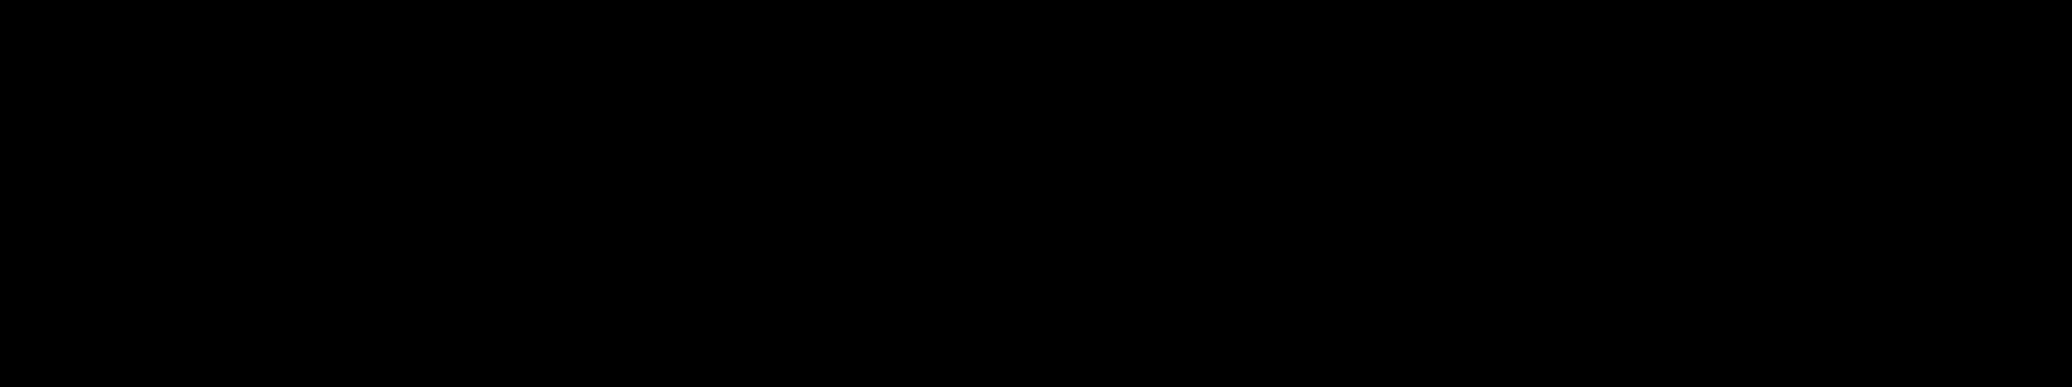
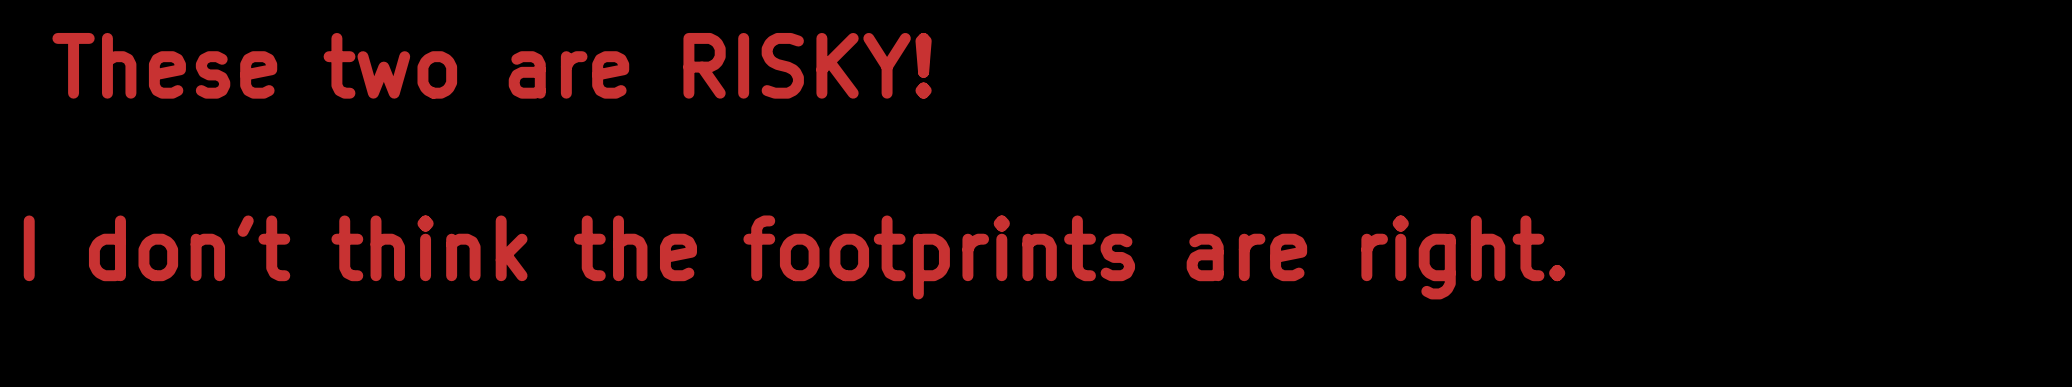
text: none -> These two are RISKY! (492, 65)
text: none -> I don't think the footprints are right. (794, 257)

